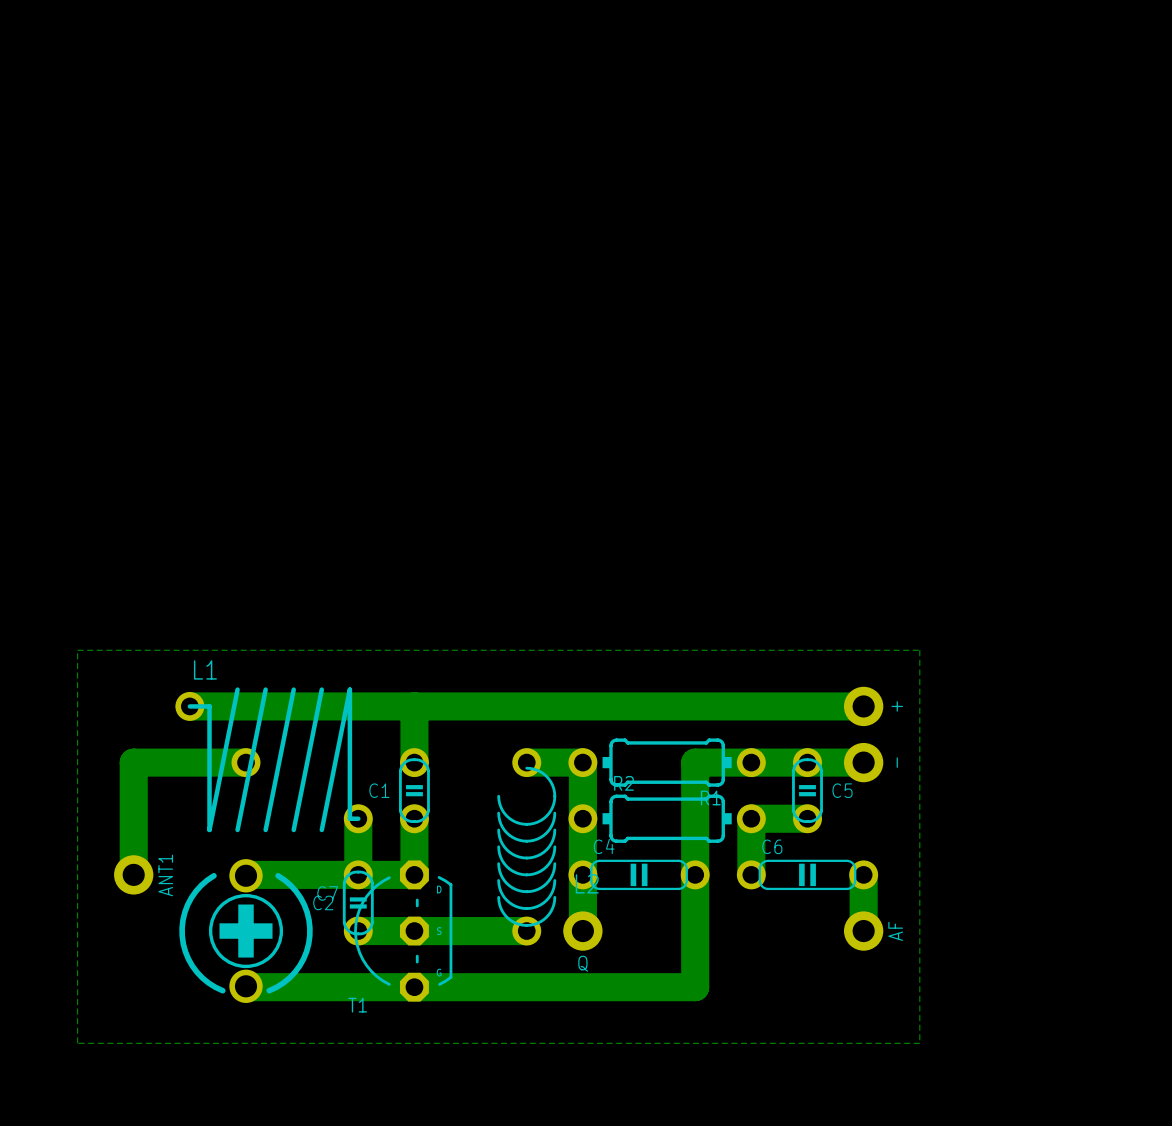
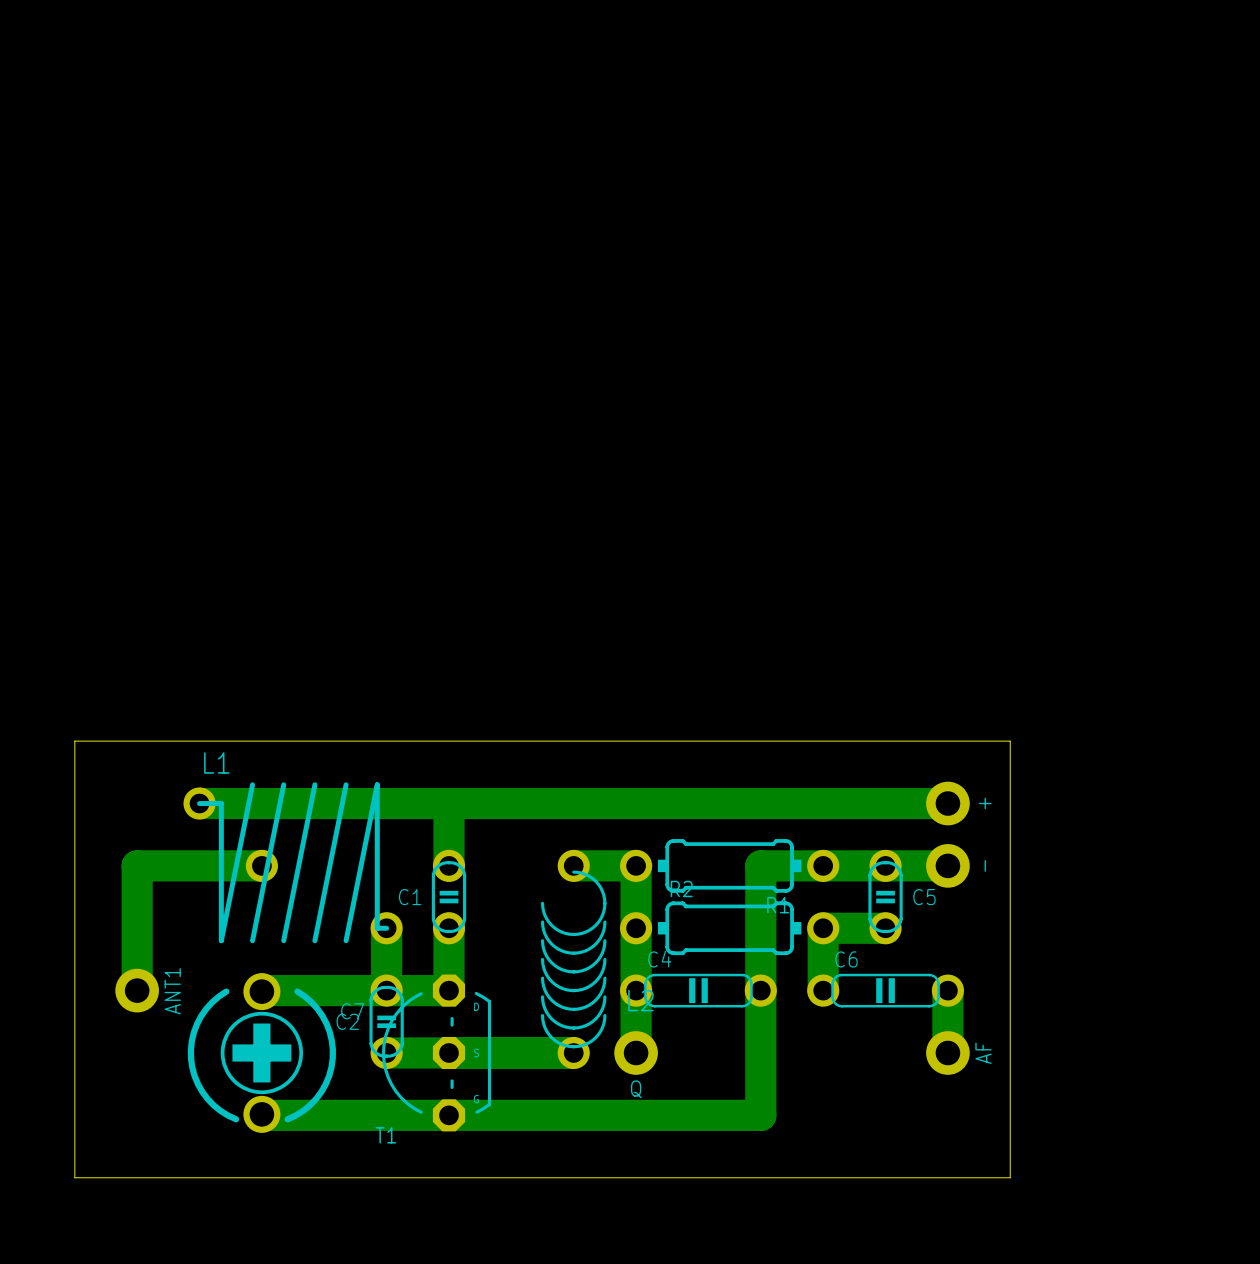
bottom zone outline: (77, 650) (77, 1043) (919, 1043) (919, 650) (77, 650) -> none
board edge: none -> (74, 741) (1010, 741) (1010, 1177) (74, 1177) (74, 741)

